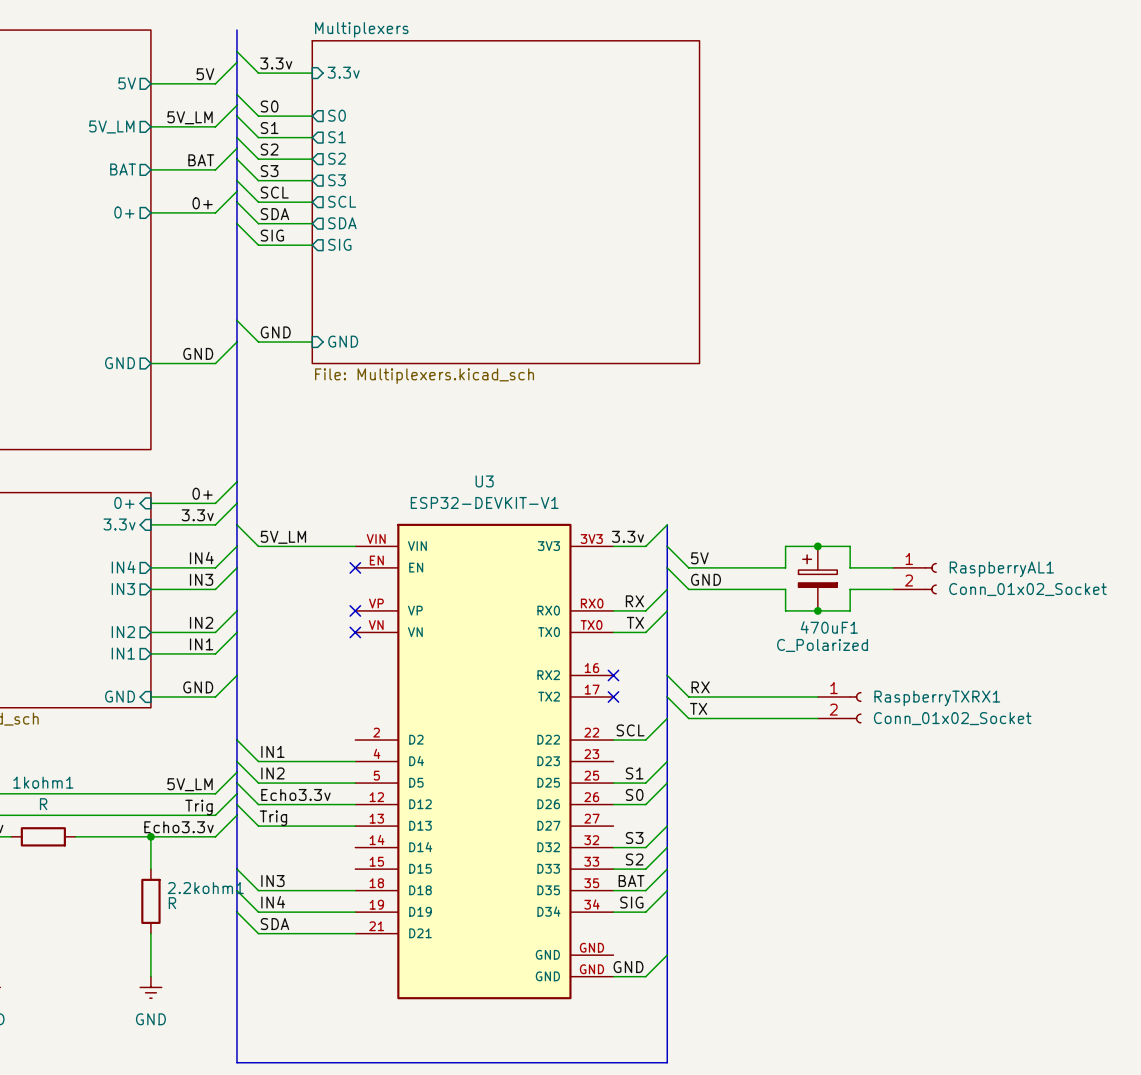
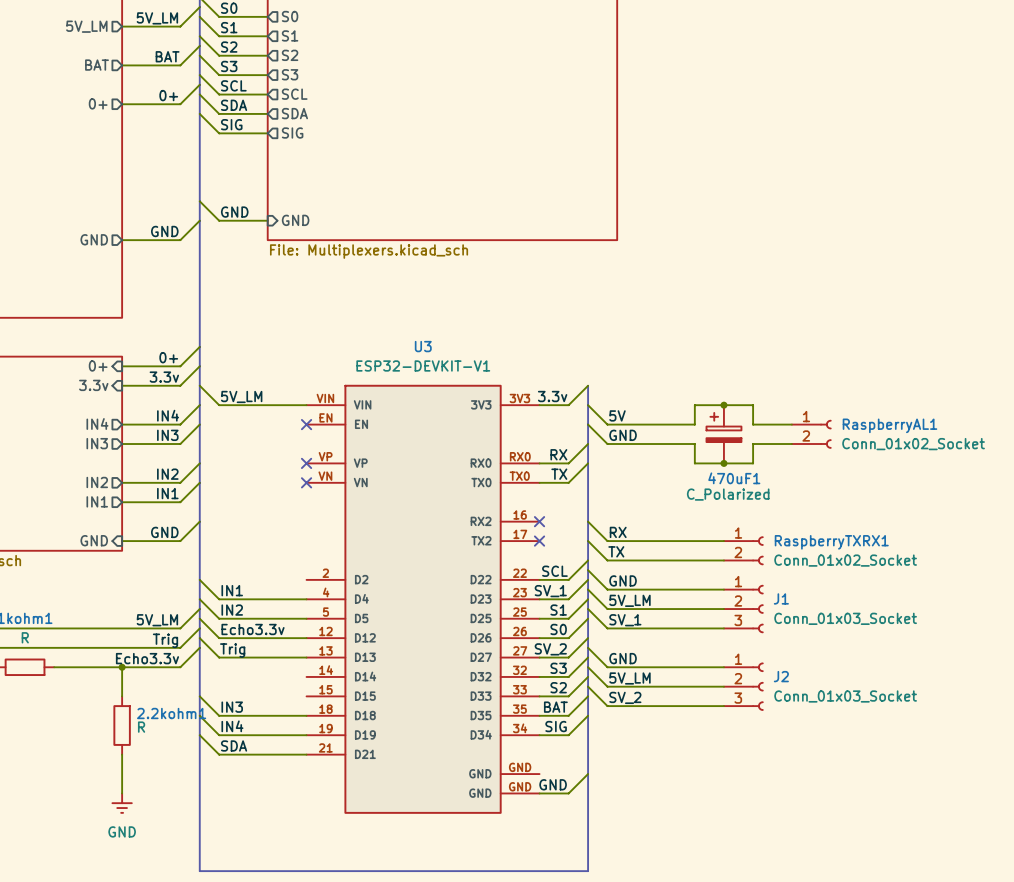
wire: none -> (588, 570) (607, 589) (723, 589)
wire: none -> (588, 579) (568, 599) (539, 599)
label: none -> GND (623, 580)
wire: none -> (588, 589) (607, 609) (723, 609)
label: none -> SV_1 (550, 591)
label: none -> 5V_LM (629, 600)
wire: none -> (588, 609) (607, 628) (723, 628)
J1: none -> Conn_01x03_Socket (743, 609)
label: none -> SV_1 (625, 620)
wire: none -> (588, 638) (568, 657) (539, 657)
wire: none -> (588, 647) (607, 667) (723, 667)
label: none -> SV_2 (550, 649)
label: none -> GND (623, 658)
wire: none -> (588, 667) (607, 686) (723, 686)
label: none -> 5V_LM (629, 678)
wire: none -> (588, 686) (607, 706) (723, 706)
J2: none -> Conn_01x03_Socket (743, 686)
label: none -> SV_2 (625, 697)

